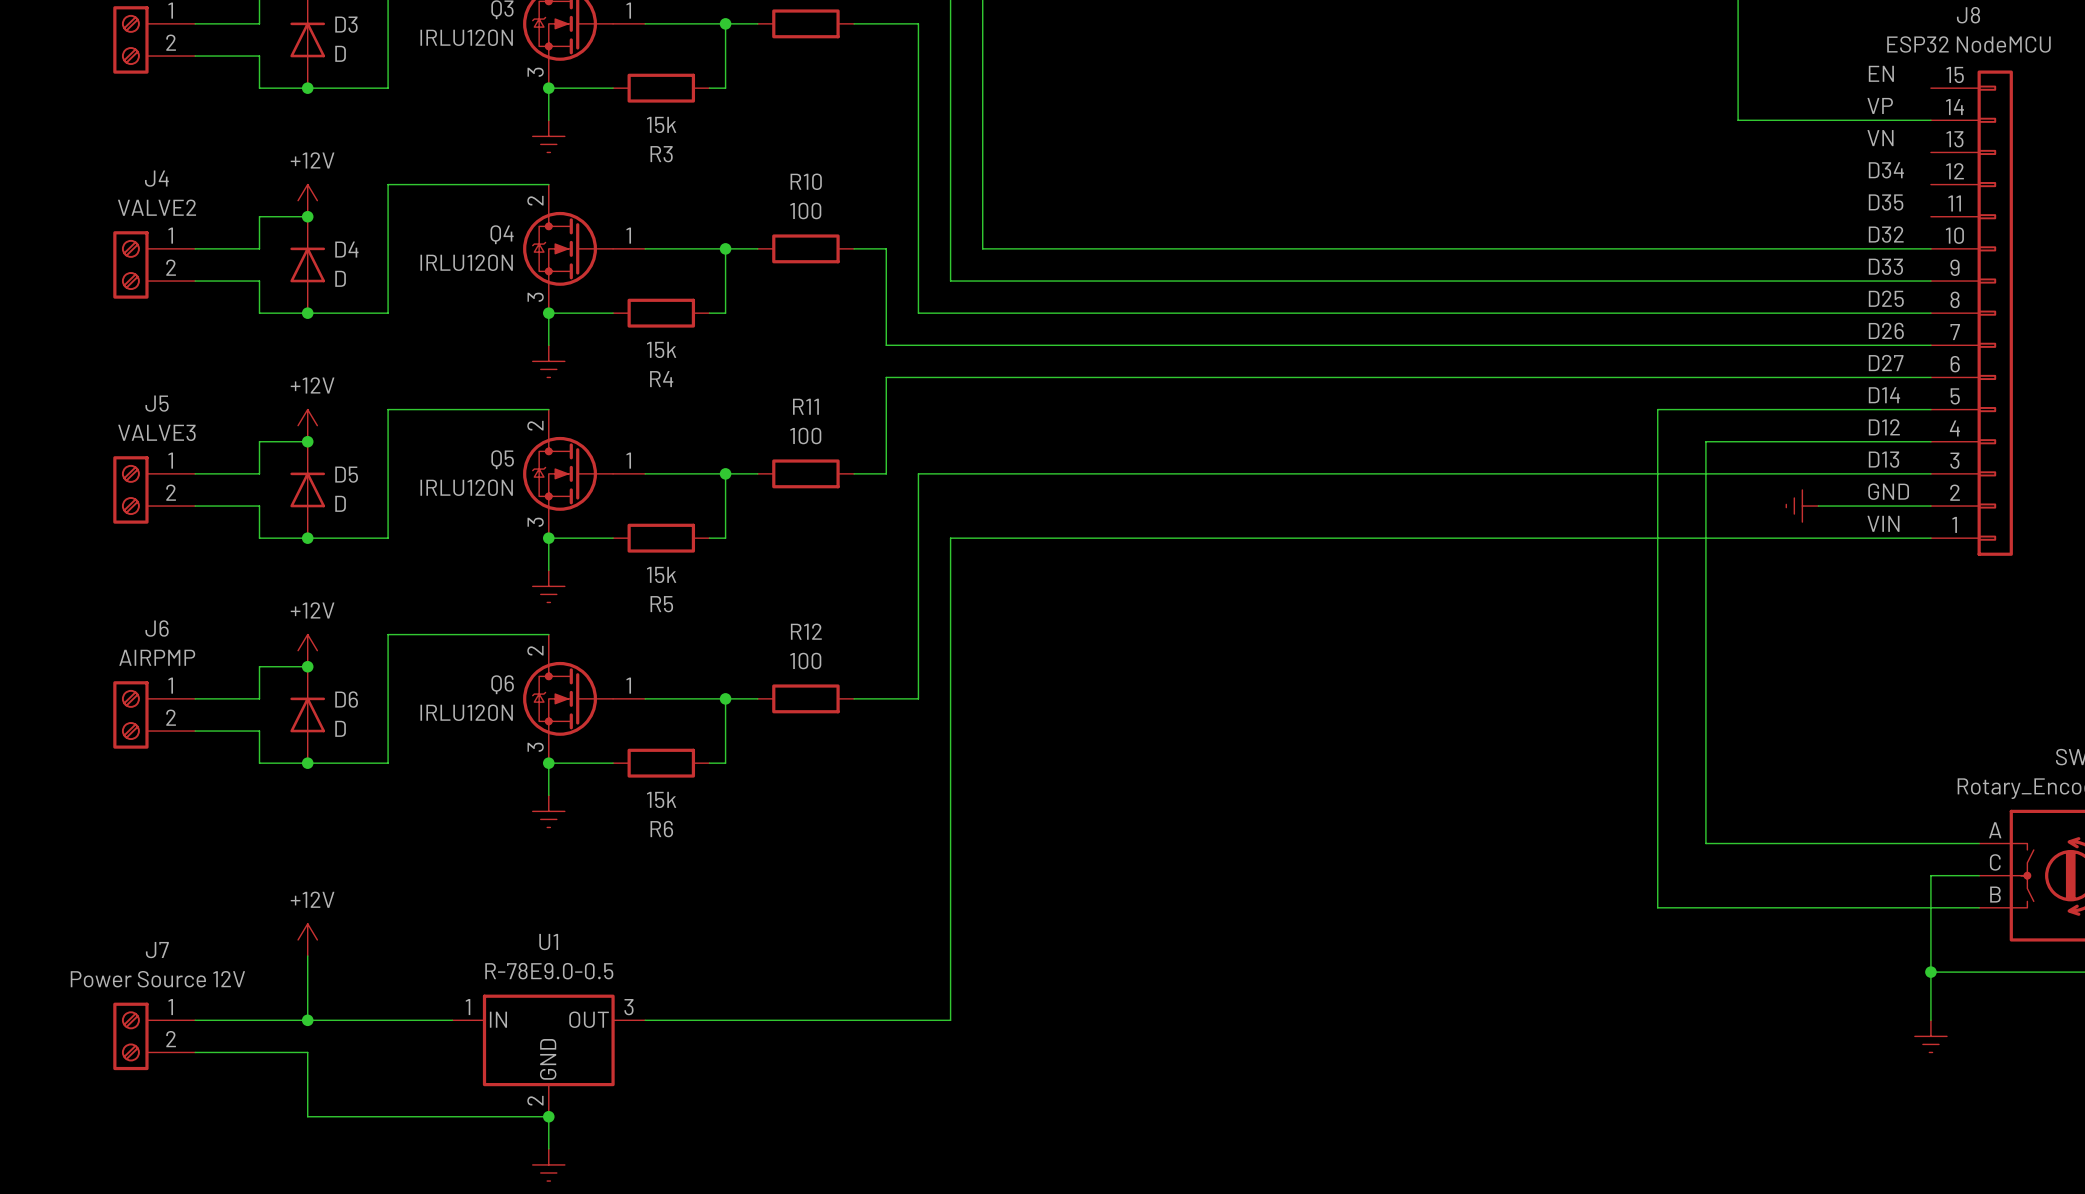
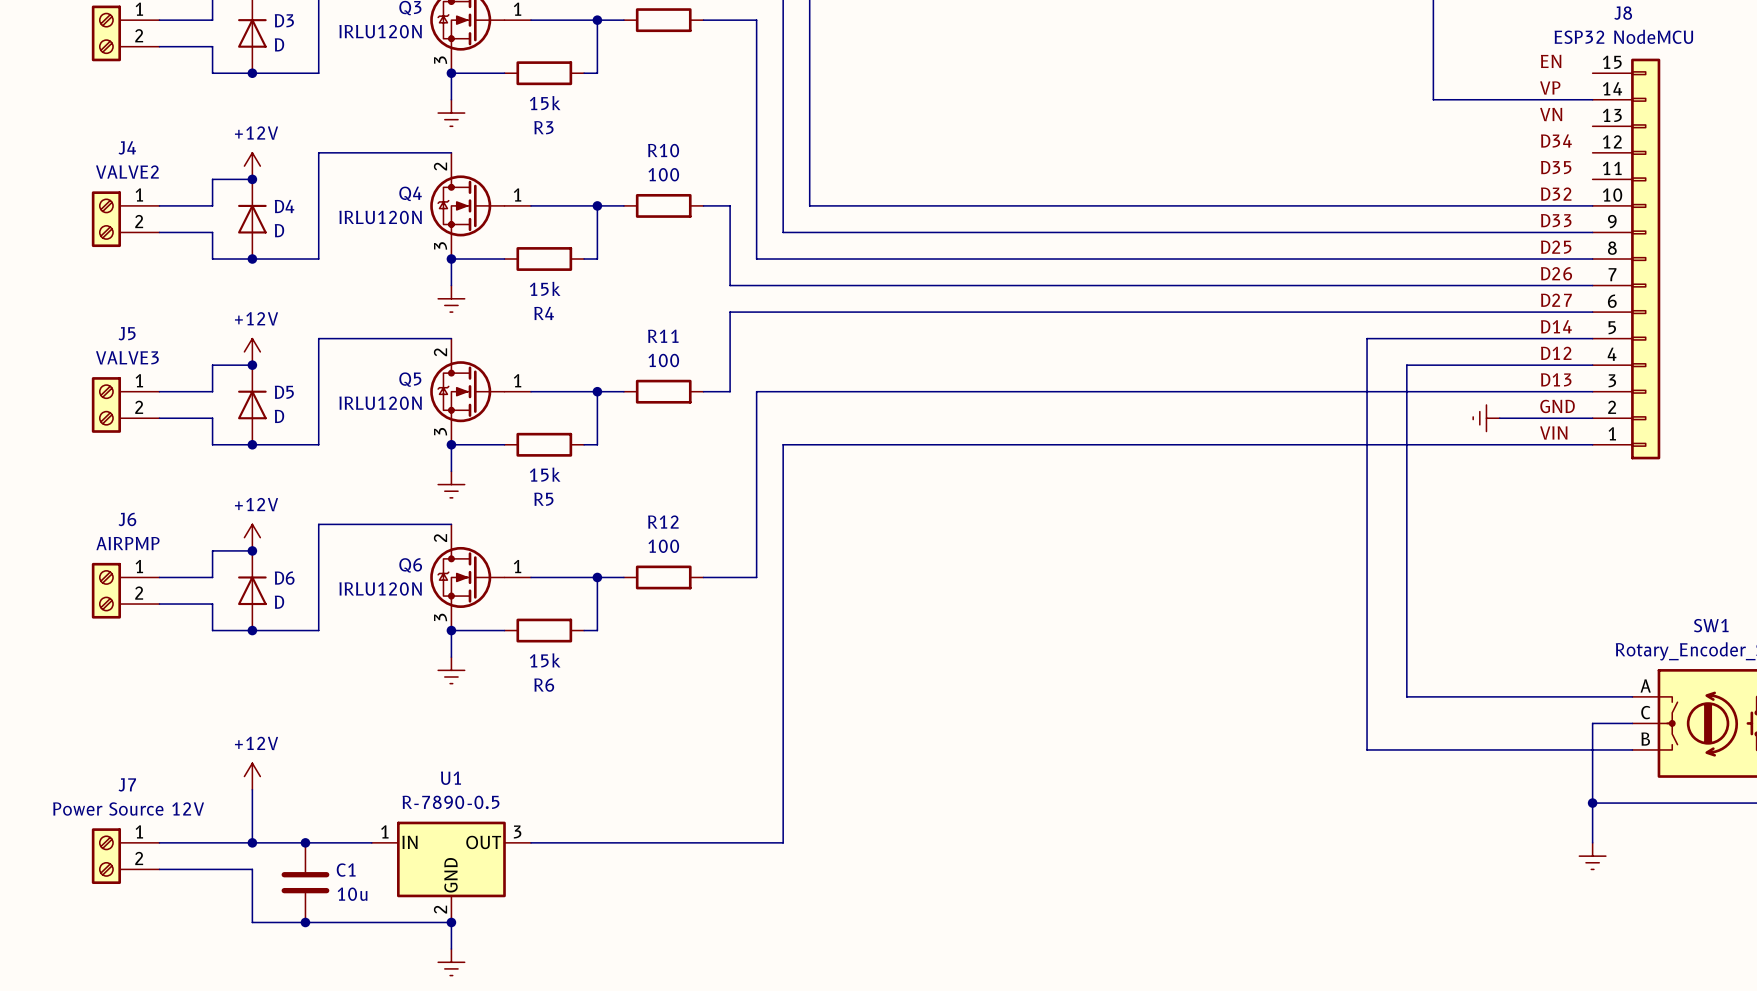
U1 value: R-78E9.0-0.5 (549, 971) -> R-7890-0.5 (451, 802)
junction: none -> (305, 842)
C1: none -> 10u (305, 882)
junction: none -> (305, 922)

